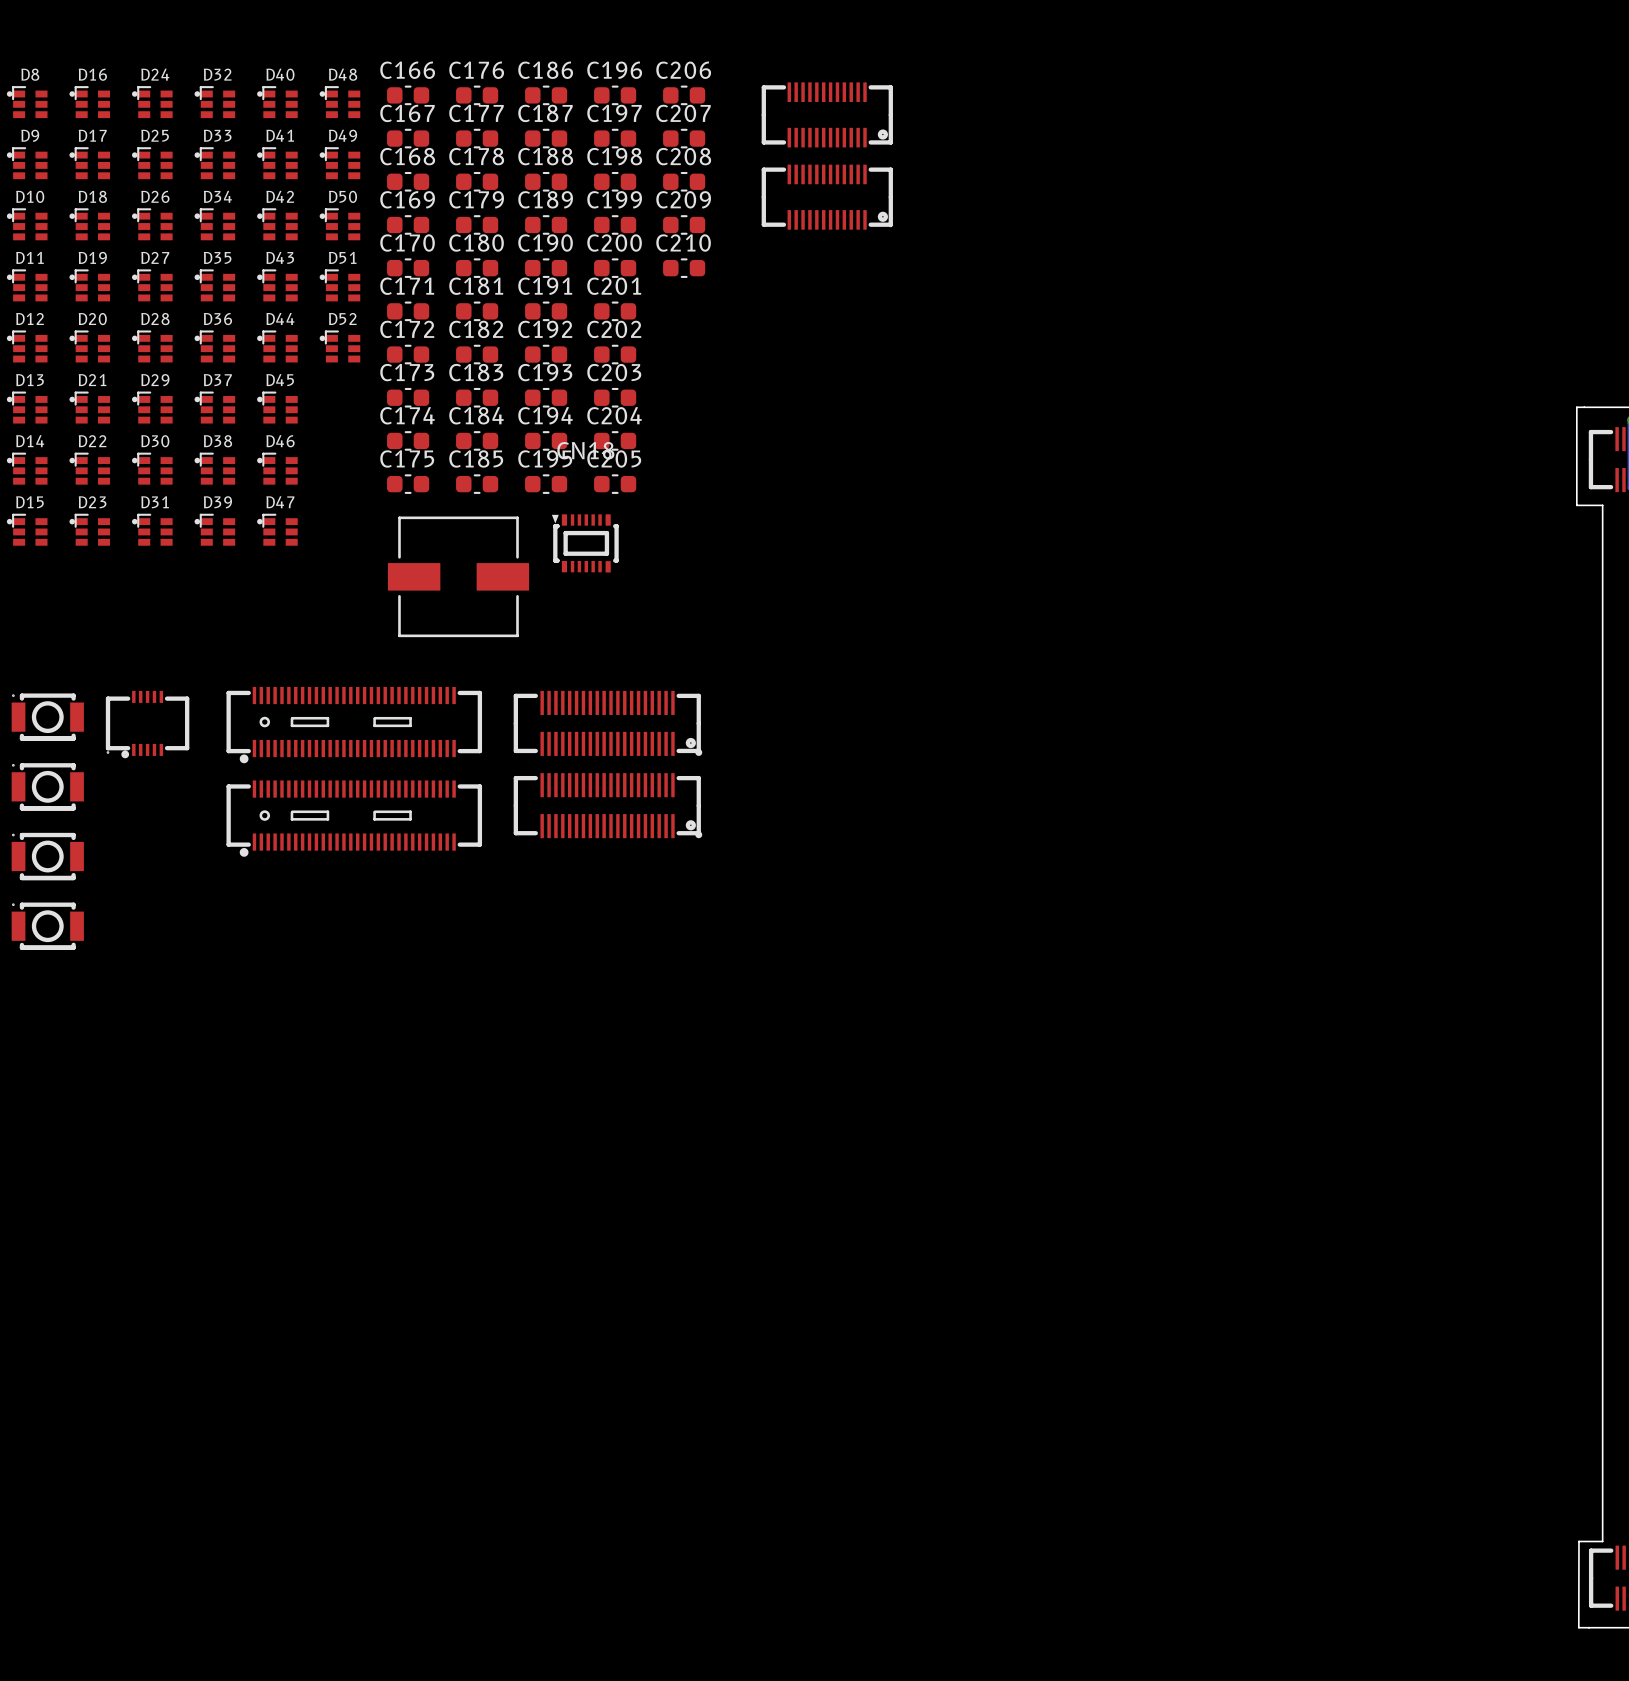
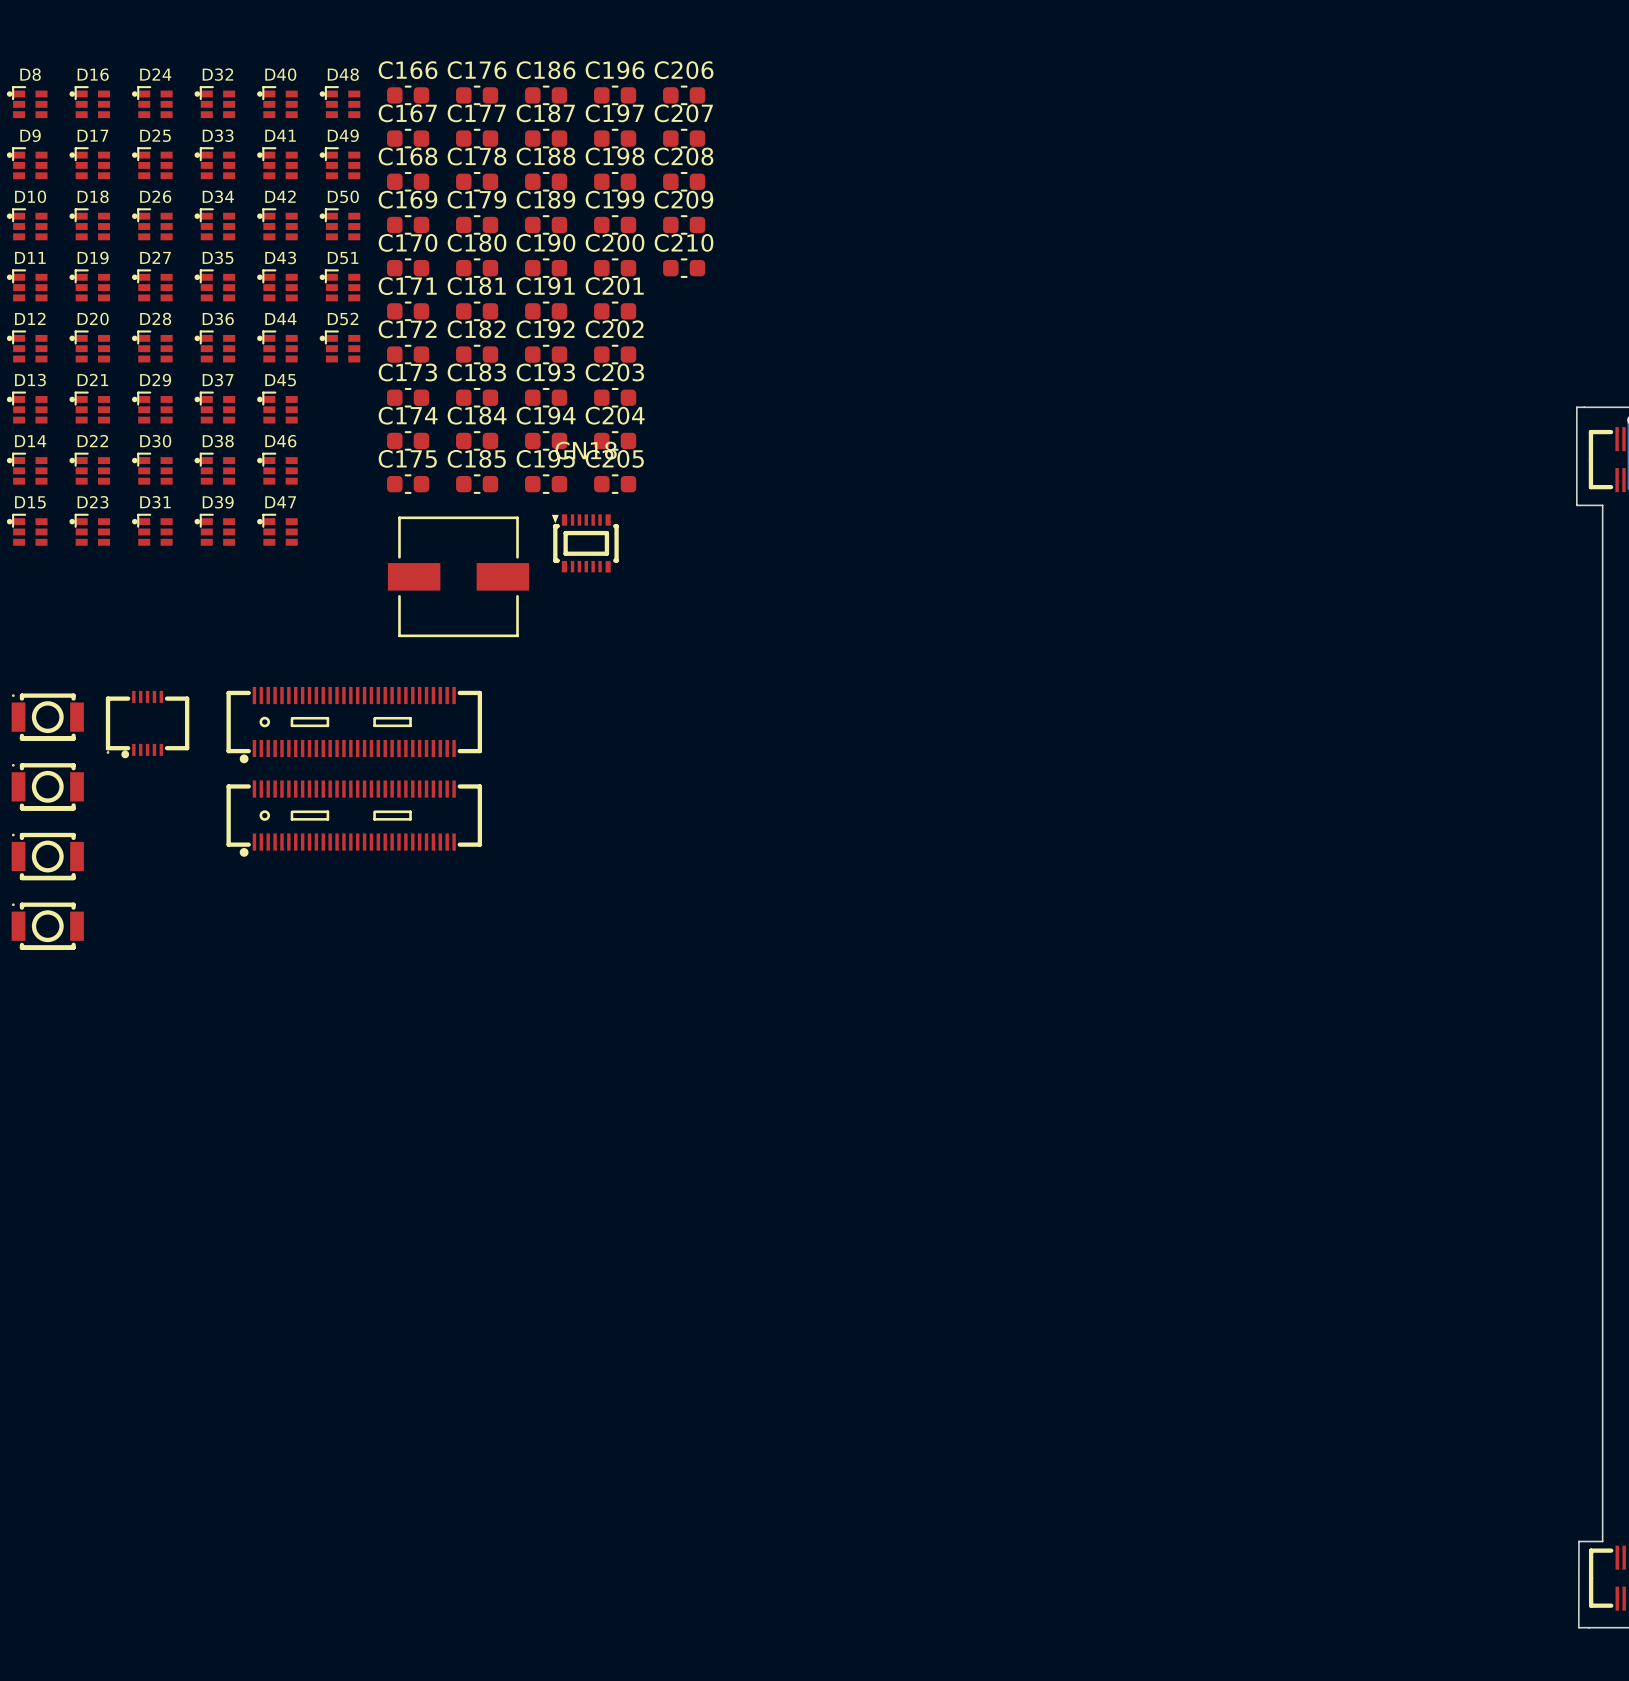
part: (827, 114) -> none
part: (827, 197) -> none
part: (607, 723) -> none
part: (607, 805) -> none

